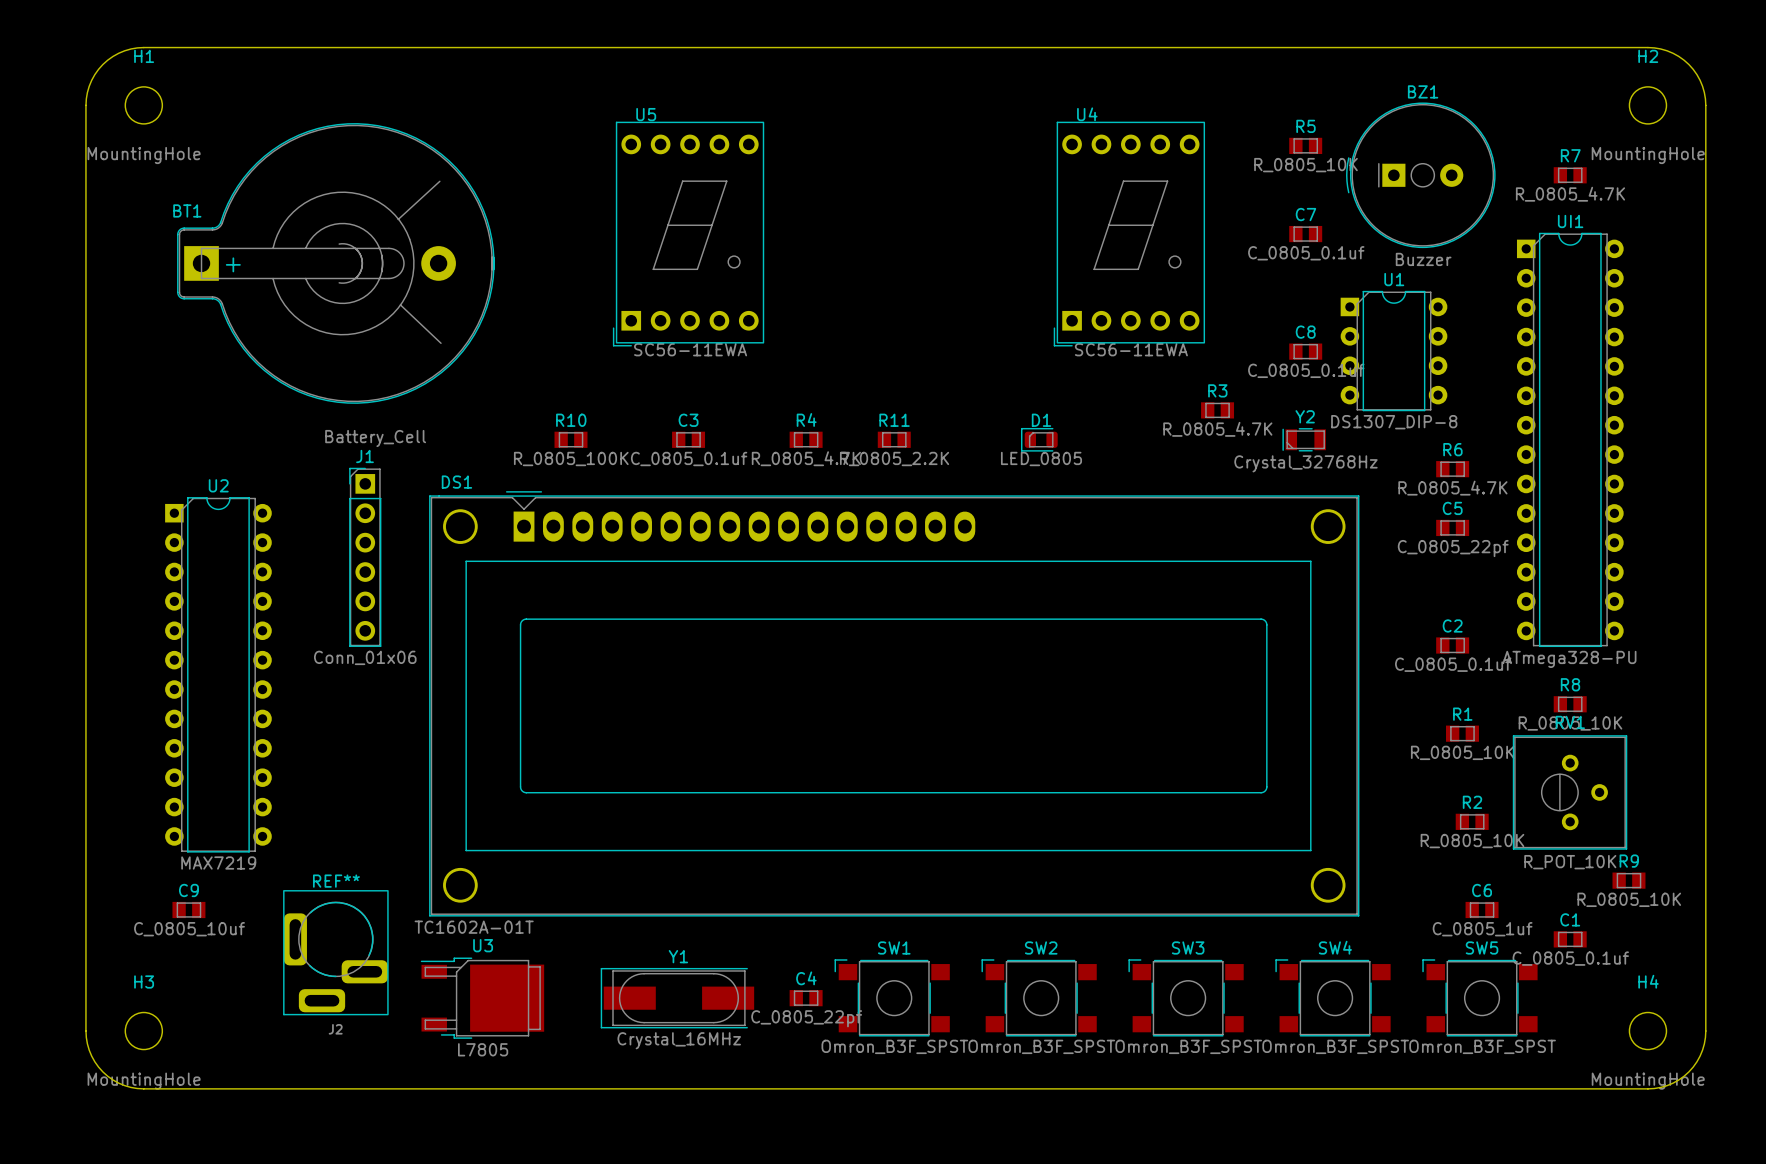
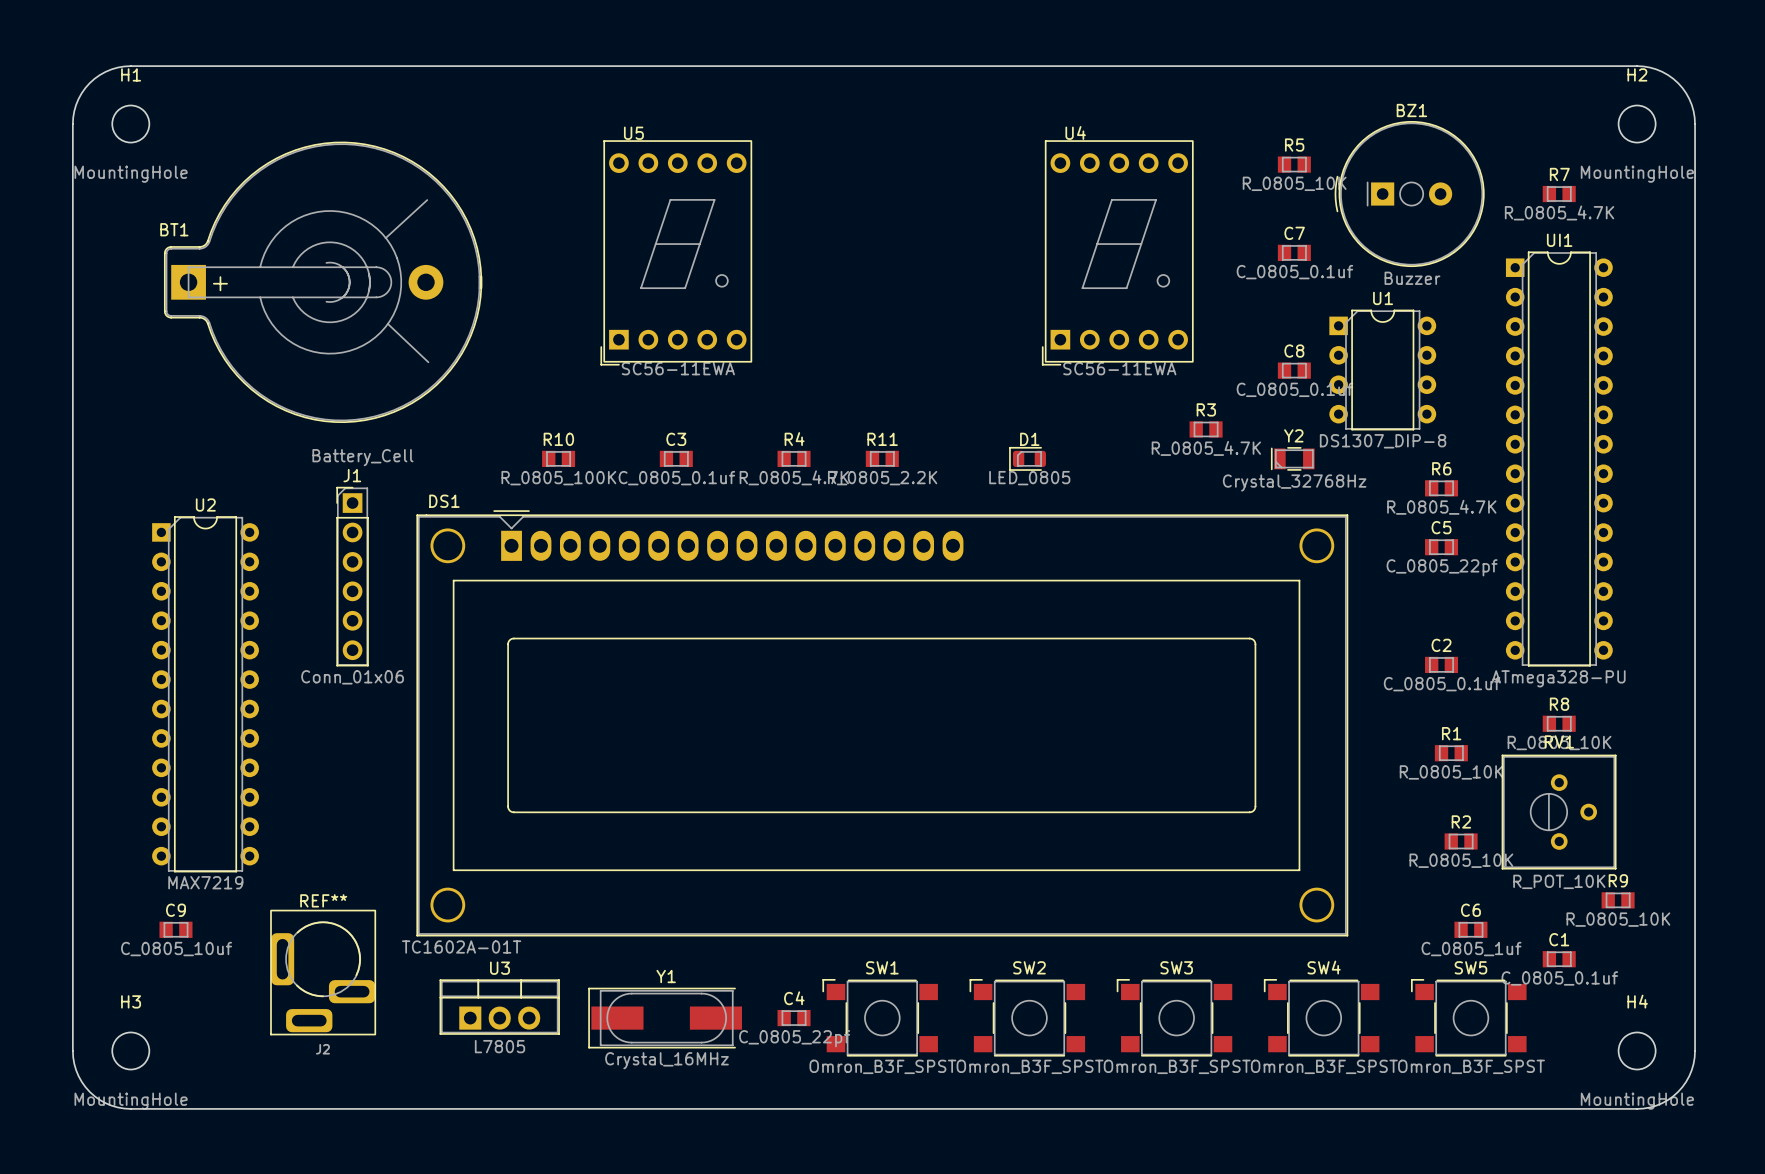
U3 footprint: [420, 957, 545, 1039] -> [439, 979, 560, 1035]

